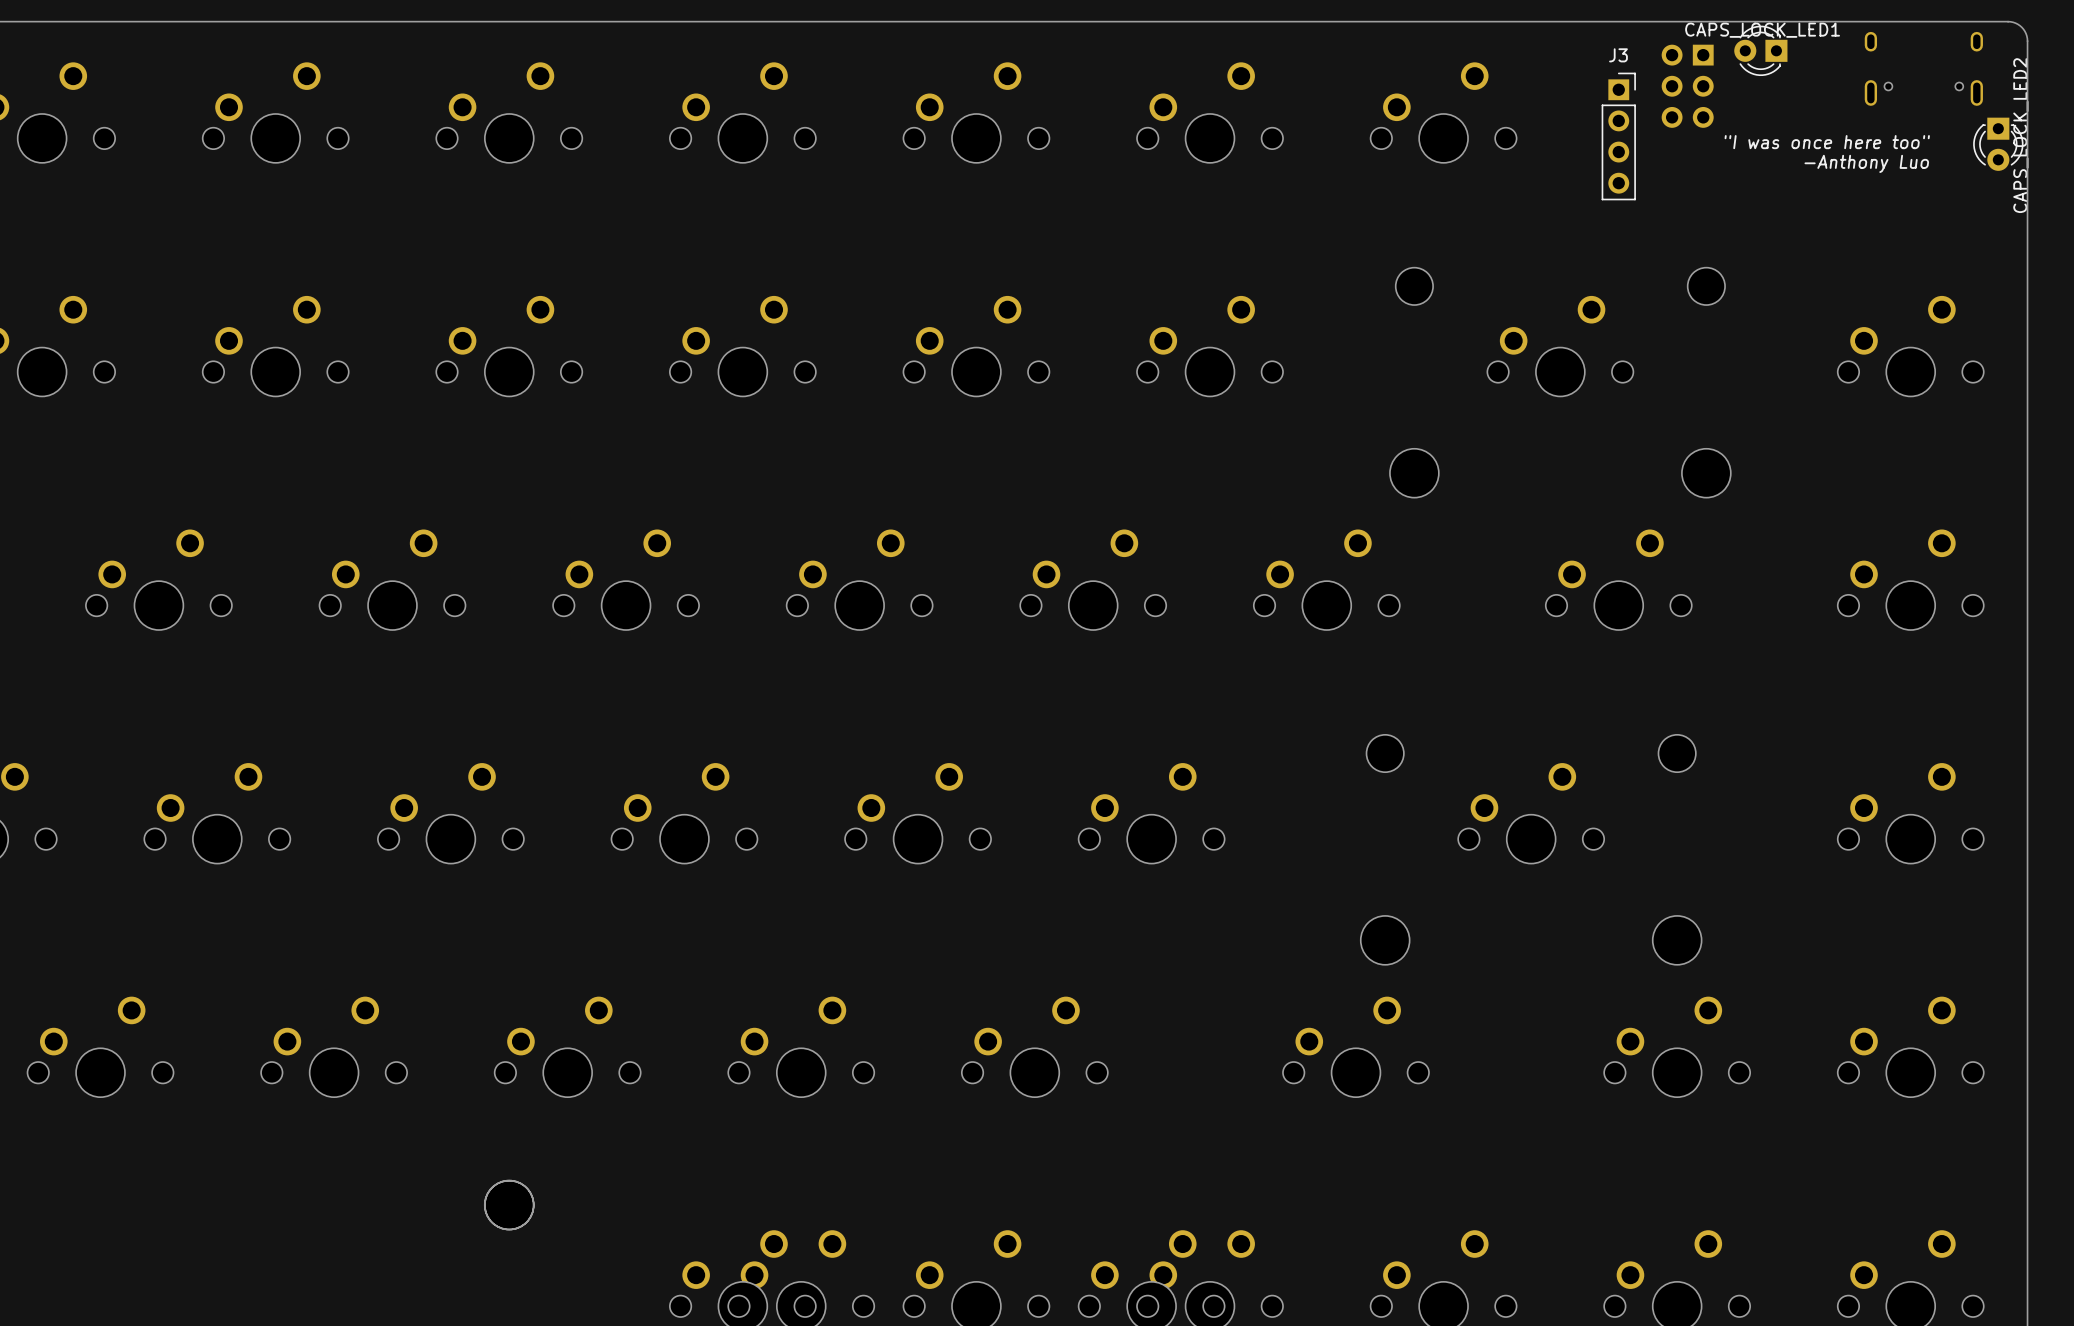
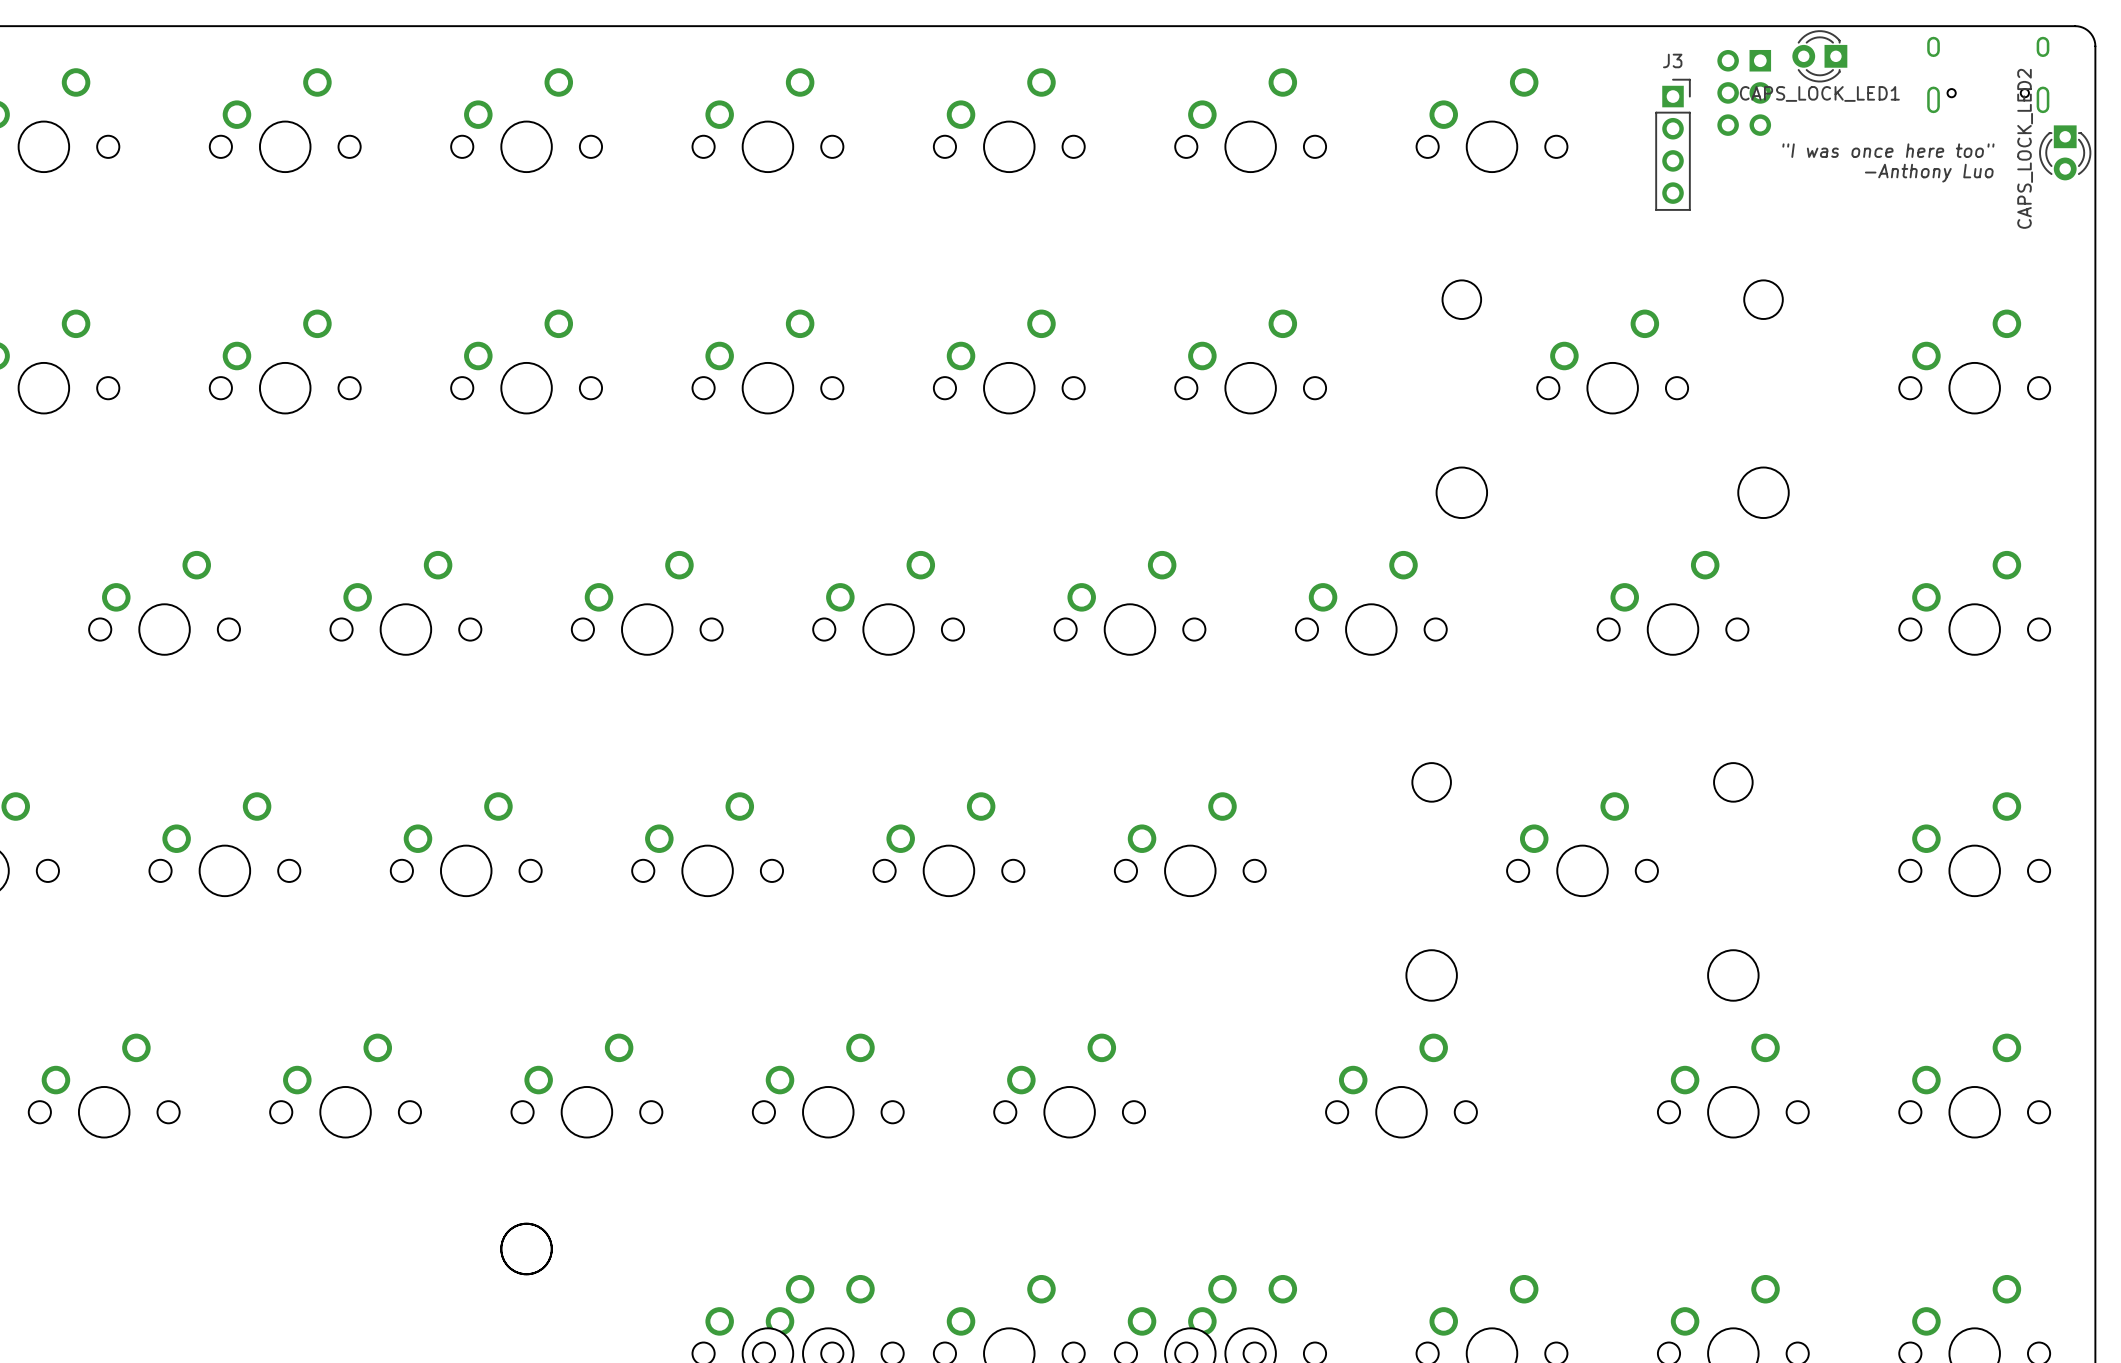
CAPS_LOCK_LED1 name position: CAPS_LOCK_LED1 (1762, 30) -> CAPS_LOCK_LED1 (1819, 93)
CAPS_LOCK_LED2 name position: CAPS_LOCK_LED2 (2020, 135) -> CAPS_LOCK_LED2 (2025, 148)

